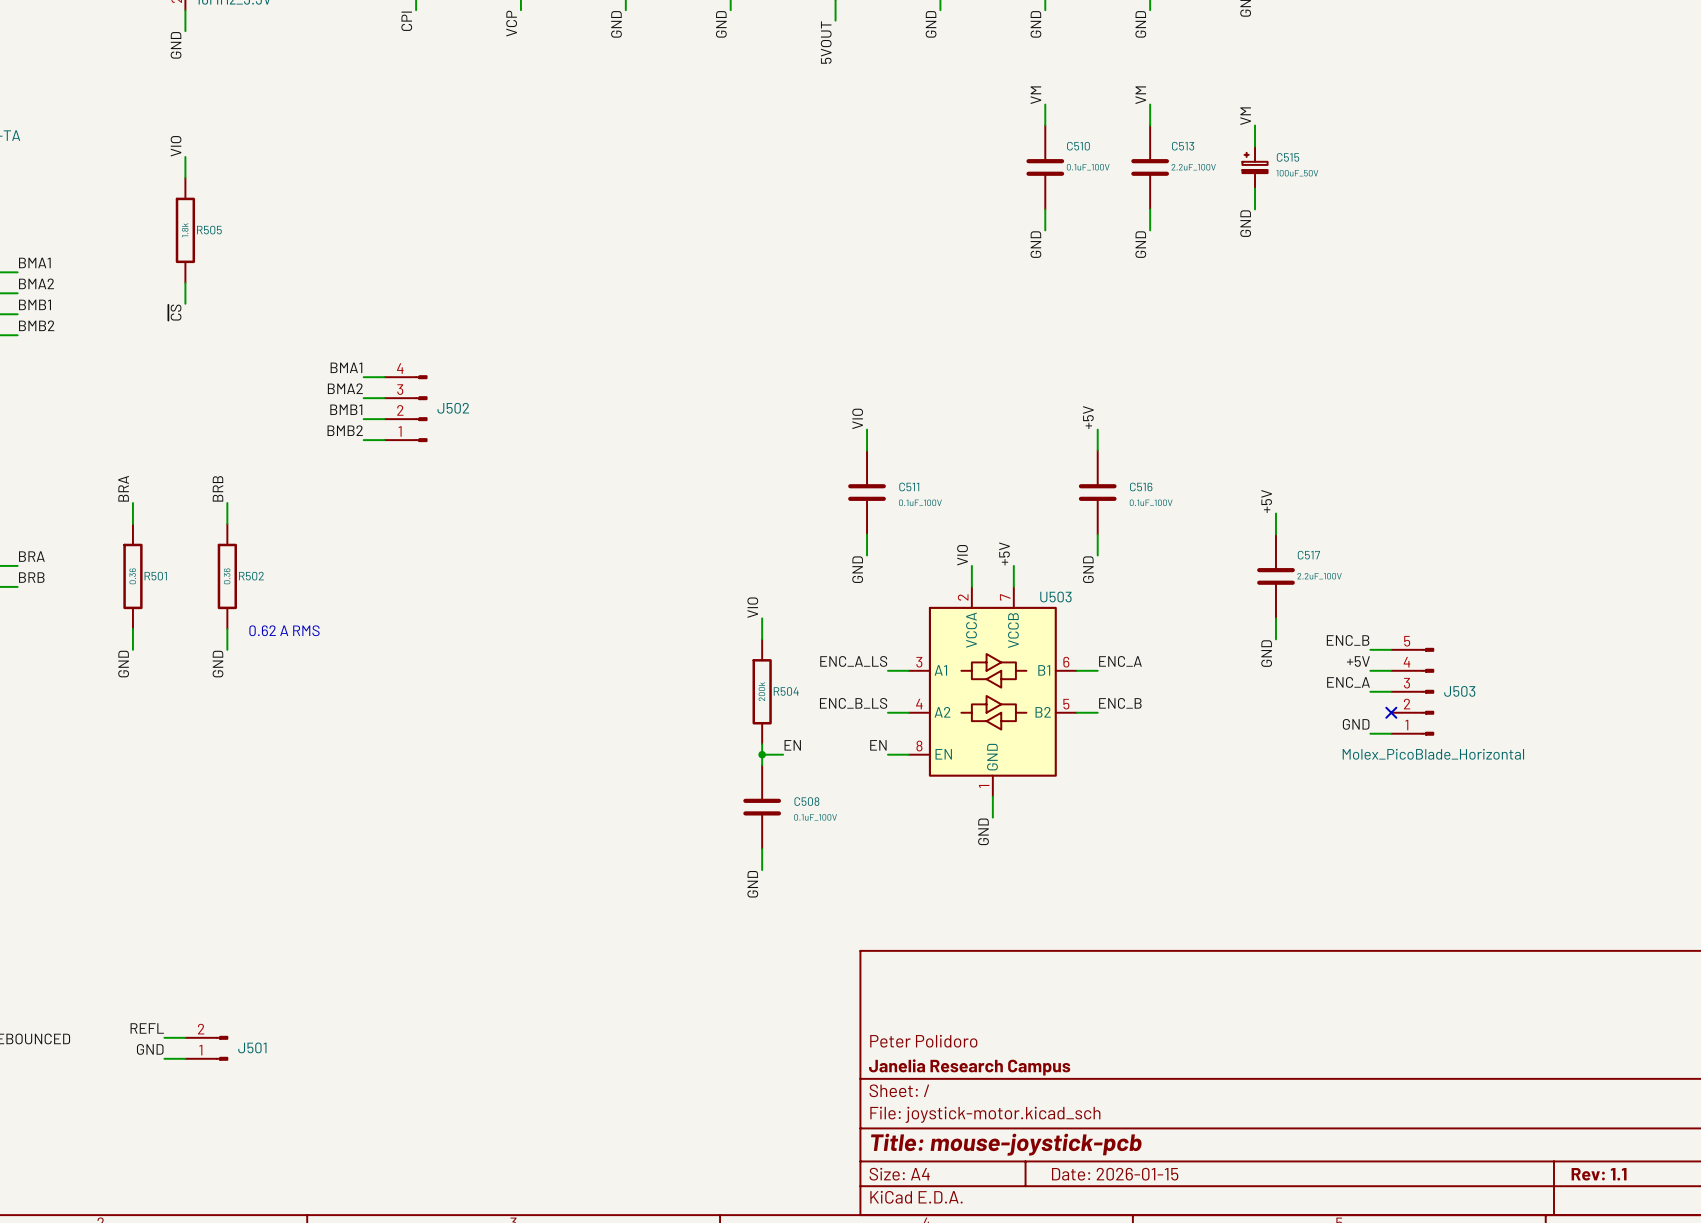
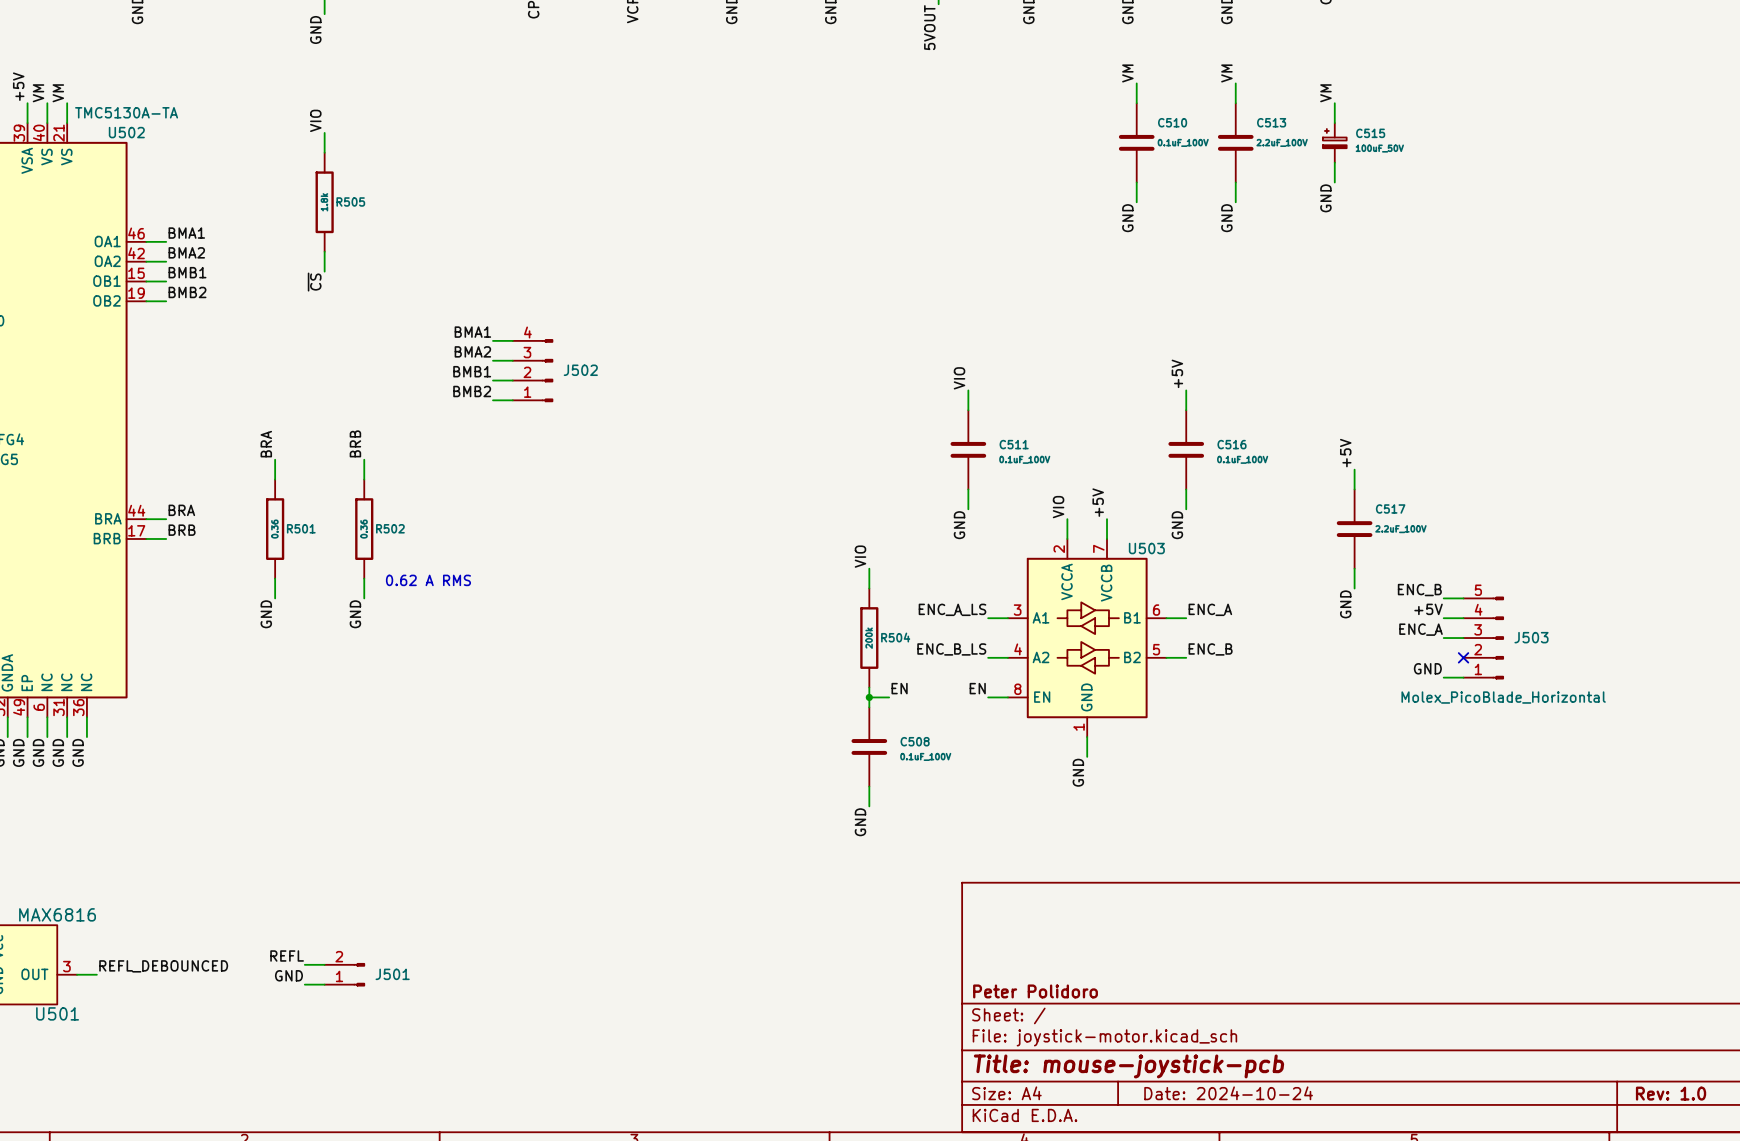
title block: Peter Polidoro (923, 1041) -> none
title block: Janelia Research Campus (969, 1067) -> Peter Polidoro (1035, 991)
title block: Date: 2026-01-15 (1115, 1174) -> Date: 2024-10-24 (1228, 1093)
title block: Rev: 1.1 (1599, 1174) -> Rev: 1.0 (1671, 1093)

